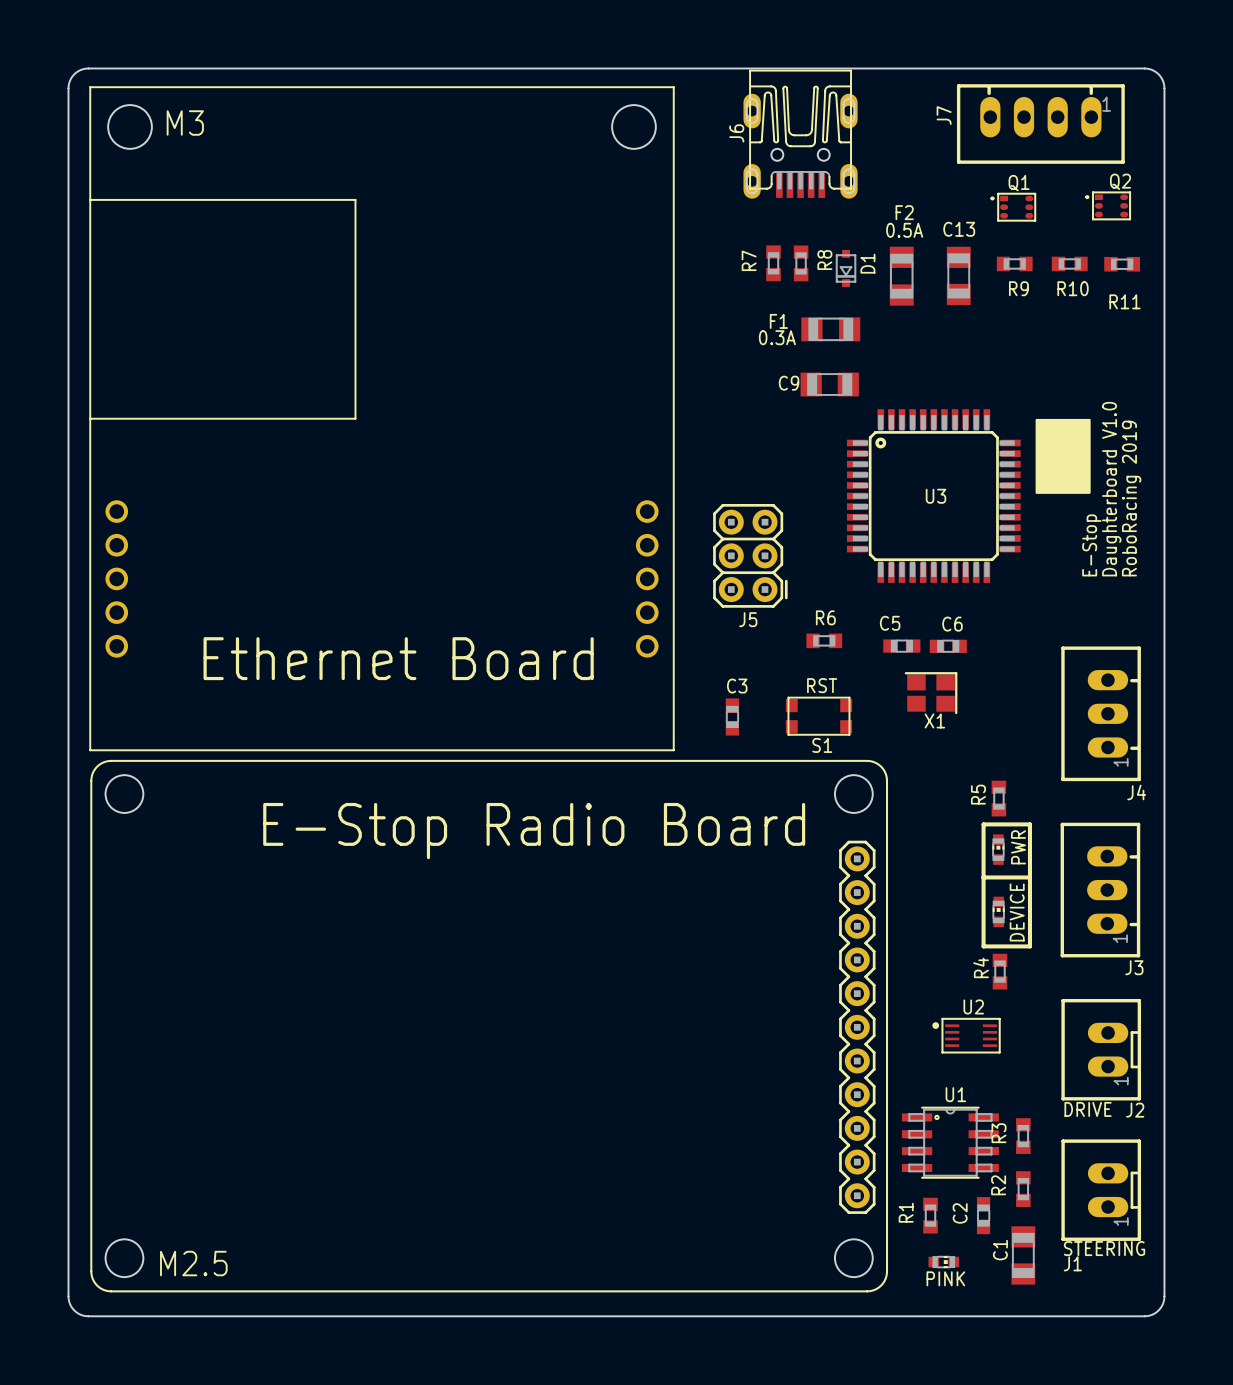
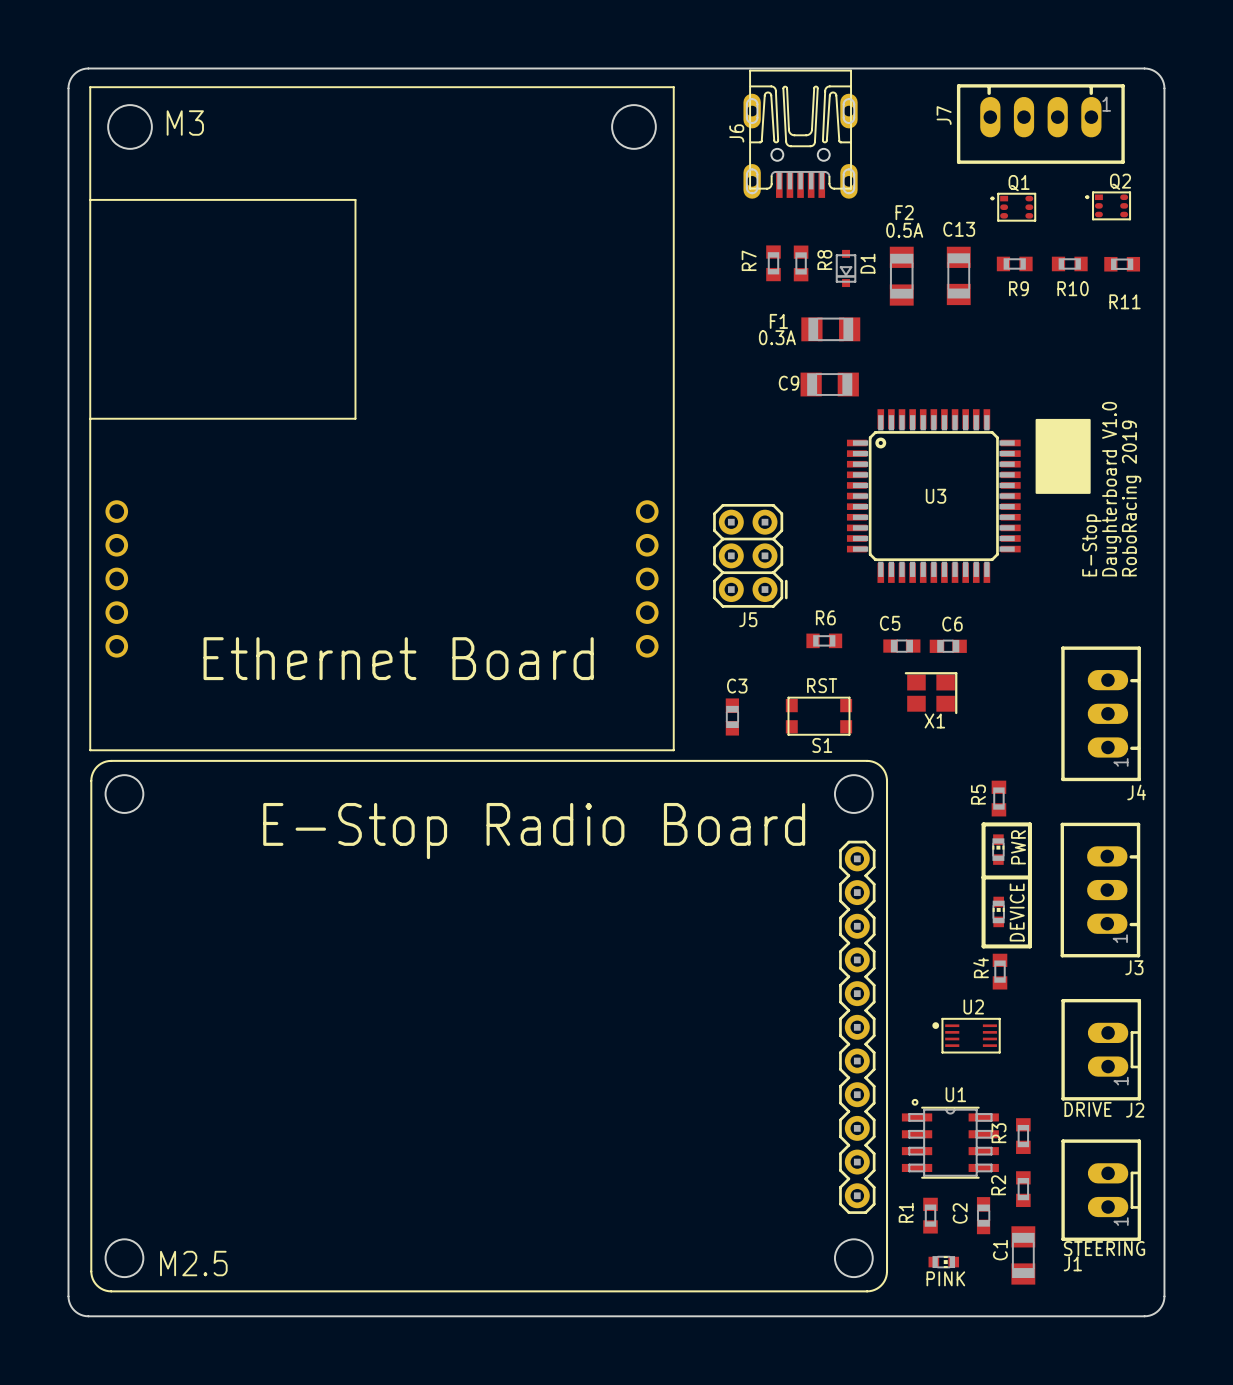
U1 footprint: [901, 1106, 999, 1179] -> [901, 1098, 999, 1179]

